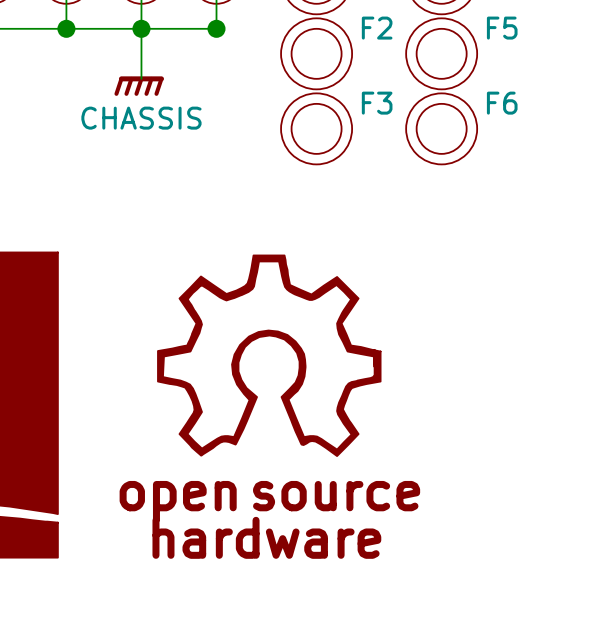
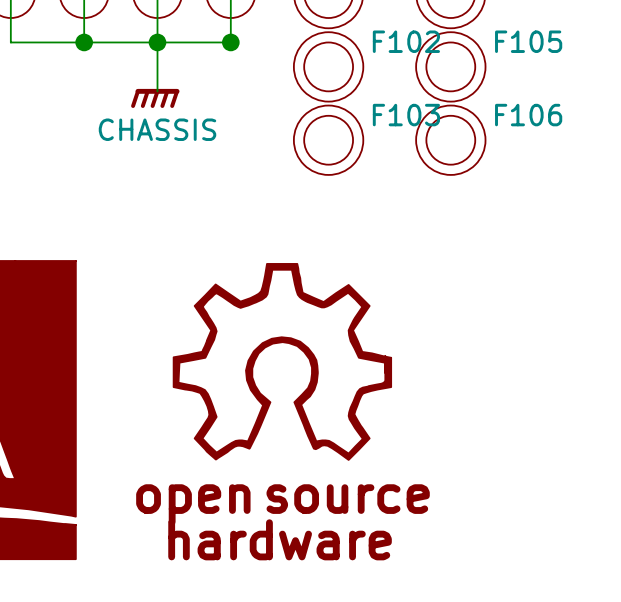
F2 name: F2 (377, 28) -> F102 (406, 41)
F5 name: F5 (502, 28) -> F105 (528, 41)
F3 name: F3 (377, 103) -> F103 (406, 115)
F6 name: F6 (502, 103) -> F106 (528, 115)

